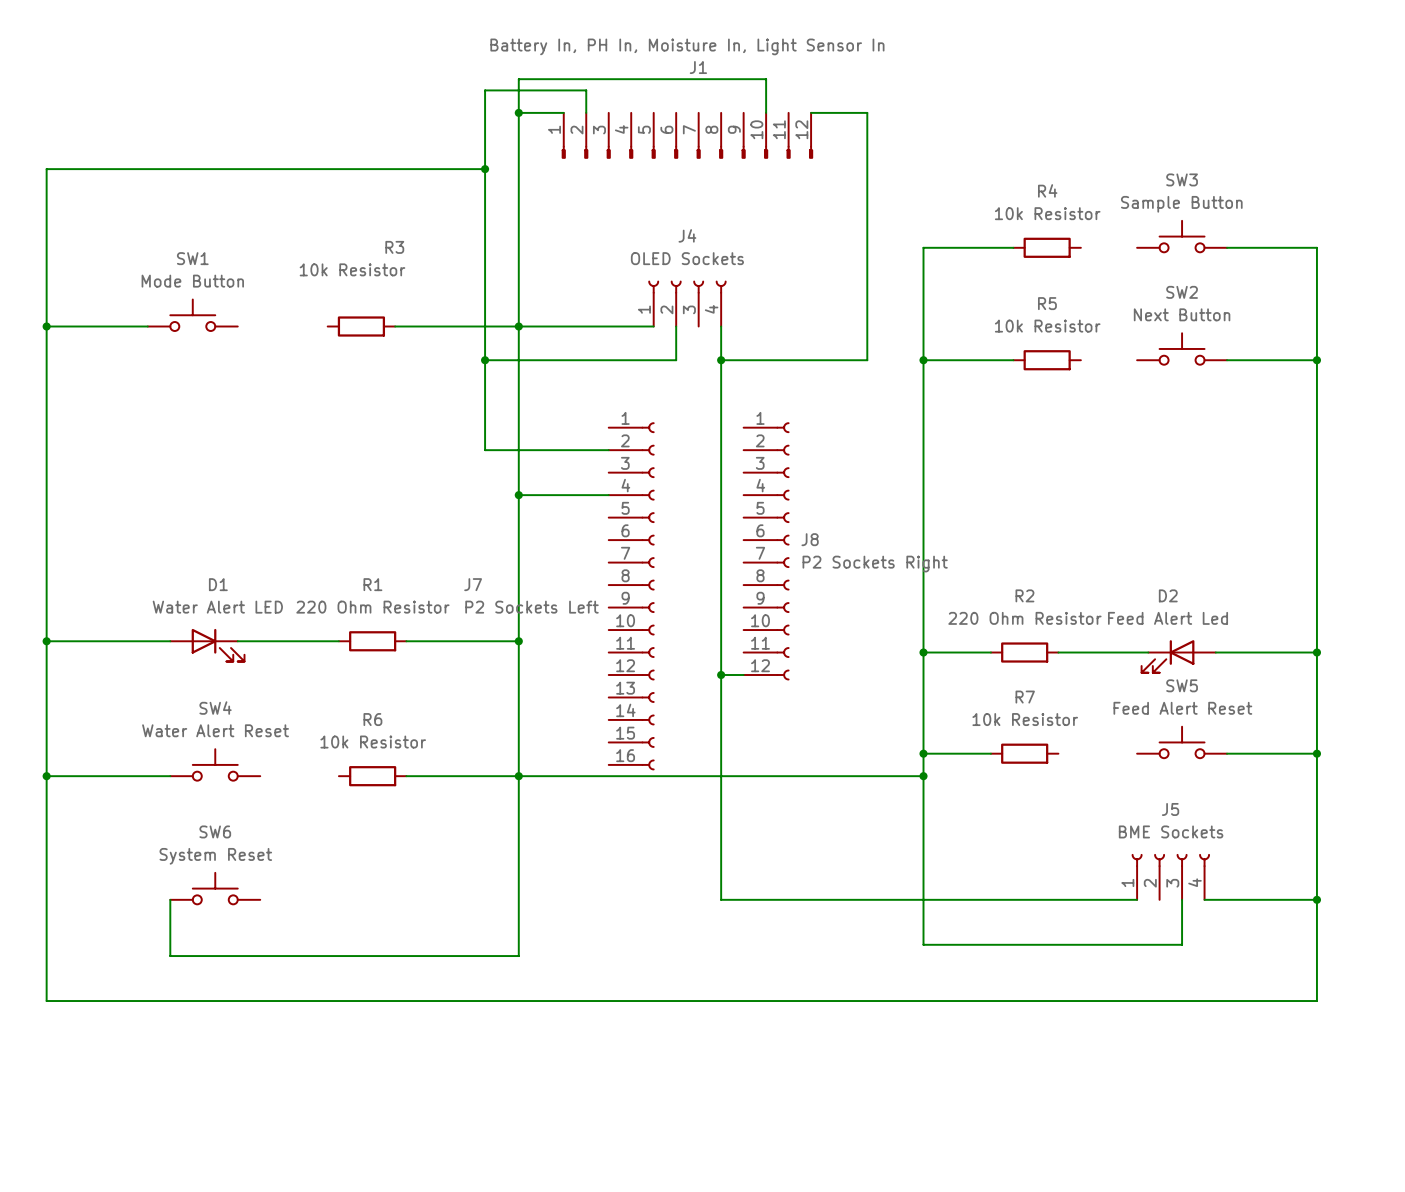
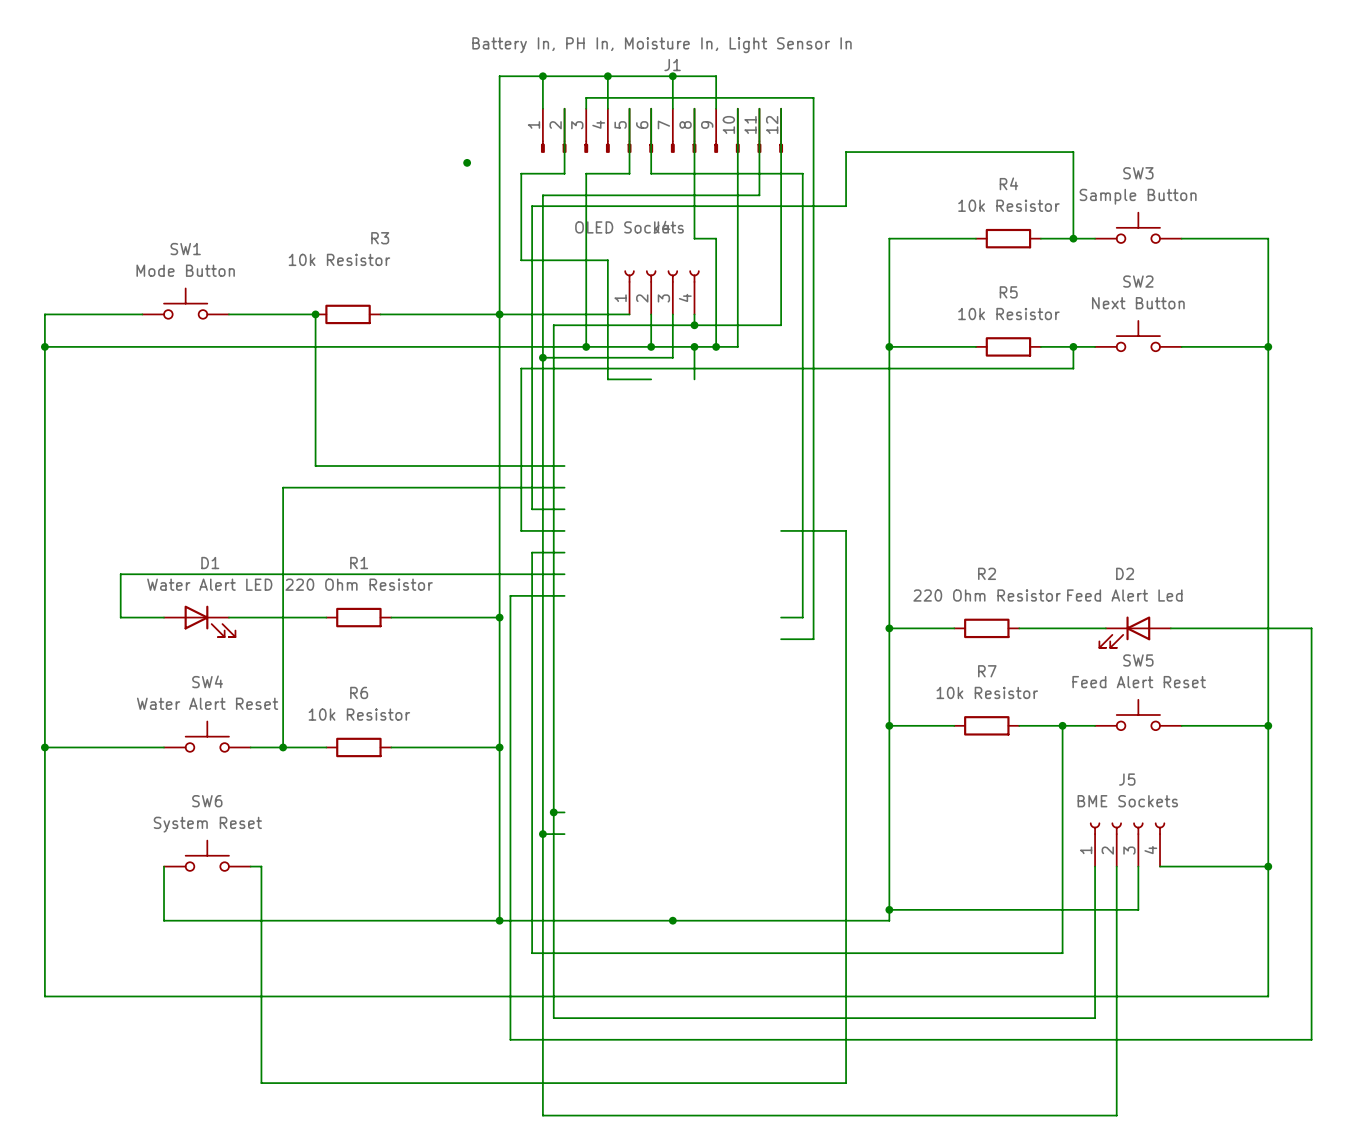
junction: none -> (542, 76)
wire: none -> (607, 76) (607, 108)
junction: none -> (607, 76)
wire: none -> (672, 76) (672, 108)
junction: none -> (672, 76)
wire: (743, 79) (766, 79) (766, 112) -> (716, 76) (716, 108)
wire: (518, 112) (563, 112) -> (542, 76) (542, 108)
junction: (518, 112) -> none
wire: (586, 112) (586, 90) (485, 90) (485, 450) (608, 450) -> (564, 108) (564, 173) (521, 173) (521, 260) (607, 260) (607, 379) (651, 379)
wire: none -> (586, 108) (586, 97) (813, 97) (813, 639) (781, 639)
wire: none -> (629, 108) (629, 173) (586, 173) (586, 346)
wire: none -> (651, 108) (651, 173) (802, 173) (802, 617) (781, 617)
wire: none -> (694, 108) (694, 238) (716, 238) (716, 346)
wire: none -> (759, 108) (759, 195) (542, 195) (542, 1115) (1116, 1115) (1116, 866)
wire: (811, 112) (867, 112) (867, 360) (766, 360) -> (737, 108) (737, 346)
wire: (485, 169) (46, 169) (46, 326) -> none
wire: none -> (1040, 238) (1095, 238)
wire: none -> (1073, 238) (1073, 152) (846, 152) (846, 206) (532, 206) (532, 509) (564, 509)
junction: none -> (1073, 238)
J4 value position: OLED Sockets (687, 258) -> OLED Sockets (629, 227)
junction position: (46, 326) -> (44, 346)
wire: none -> (228, 314) (315, 314) (315, 465) (564, 465)
junction: none -> (315, 314)
wire: none -> (672, 314) (672, 357) (542, 357)
wire: (721, 337) (721, 360) -> (651, 346) (694, 346)
junction: none -> (694, 325)
wire: none -> (44, 346) (467, 346)
junction: (485, 360) -> none
junction: none -> (586, 346)
junction: none -> (651, 346)
junction: none -> (716, 346)
wire: none -> (1040, 346) (1095, 346)
wire: none -> (1073, 346) (1073, 368) (521, 368) (521, 530) (564, 530)
junction: none -> (1073, 346)
junction: none -> (542, 357)
wire: (721, 393) (721, 899) (1137, 899) -> (781, 108) (781, 325) (553, 325) (553, 1018) (1095, 1018) (1095, 866)
wire: (518, 495) (608, 495) -> none
junction: (518, 495) -> none
wire: none -> (564, 487) (283, 487) (283, 747)
J8: P2 Sockets Right (766, 551) -> none
wire: none -> (781, 530) (846, 530) (846, 1083) (261, 1083) (261, 866) (250, 866)
wire: none -> (564, 552) (532, 552) (532, 953) (1062, 953) (1062, 725)
J7: P2 Sockets Left (631, 596) -> none
wire: none -> (564, 595) (510, 595) (510, 1039) (1311, 1039) (1311, 628) (1268, 628)
wire: (46, 641) (125, 641) -> (564, 574) (120, 574) (120, 617)
junction: (46, 641) -> none
junction: (1316, 652) -> none
wire: (721, 674) (743, 674) -> none
junction: (721, 674) -> none
wire: none -> (1019, 725) (1095, 725)
junction: none -> (1062, 725)
wire: none -> (250, 747) (326, 747)
junction: none -> (283, 747)
wire: (518, 776) (923, 776) -> none
junction: (923, 776) -> none
wire: none -> (553, 812) (564, 812)
junction: none -> (553, 812)
wire: none -> (542, 834) (564, 834)
junction: none -> (542, 834)
wire: none -> (889, 909) (889, 920) (499, 920)
junction: none -> (889, 909)
junction: none -> (499, 920)
junction: none -> (672, 920)
wire: (46, 1001) (1316, 1001) -> (44, 964) (44, 996) (1268, 996) (1268, 964)

